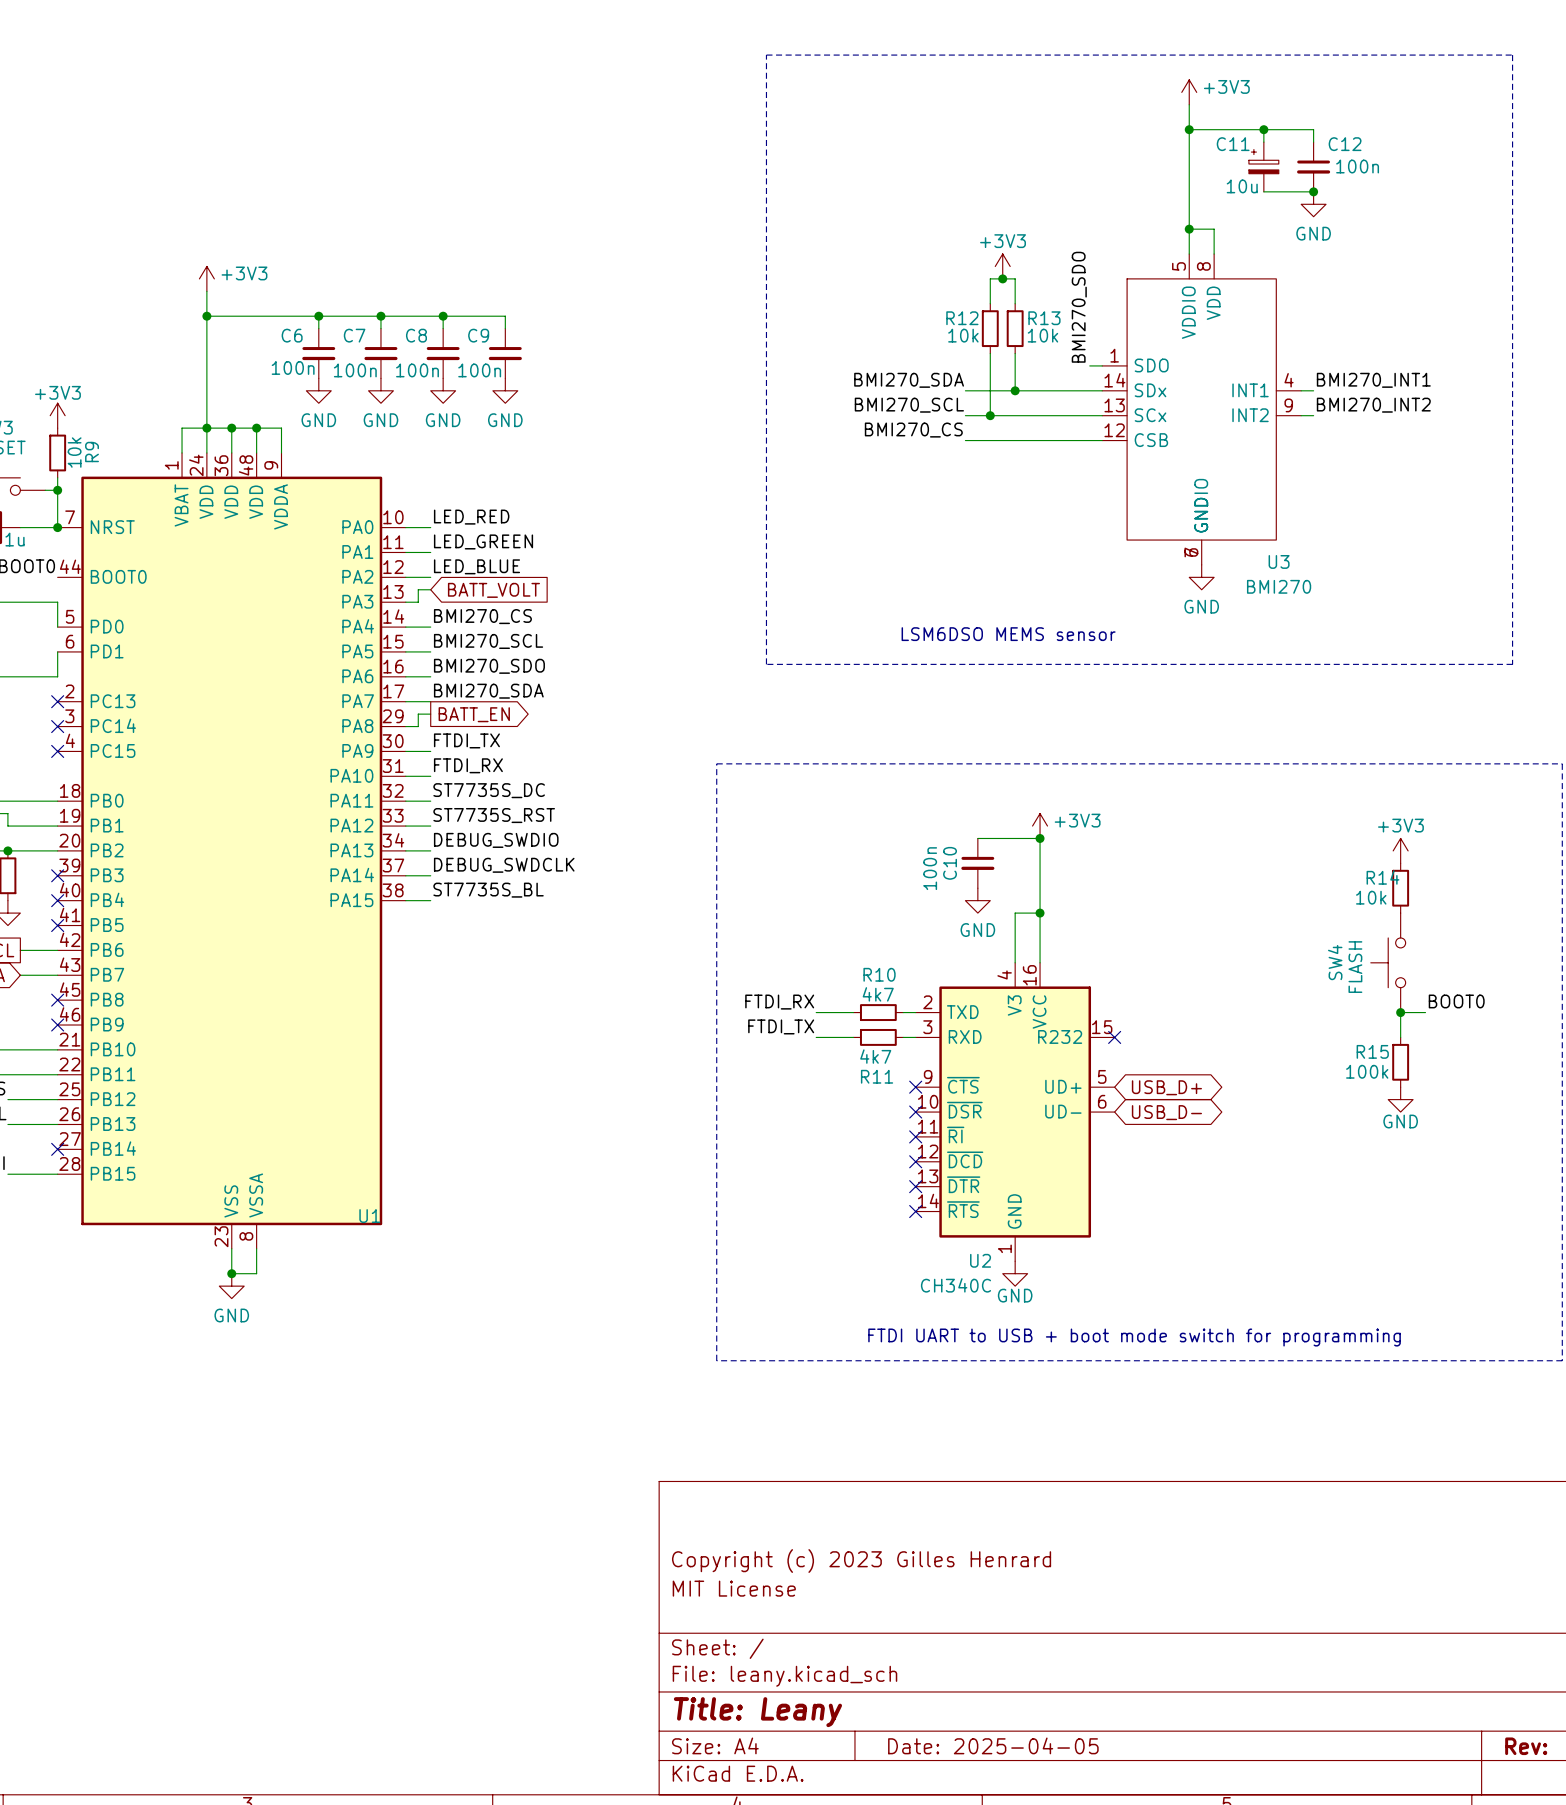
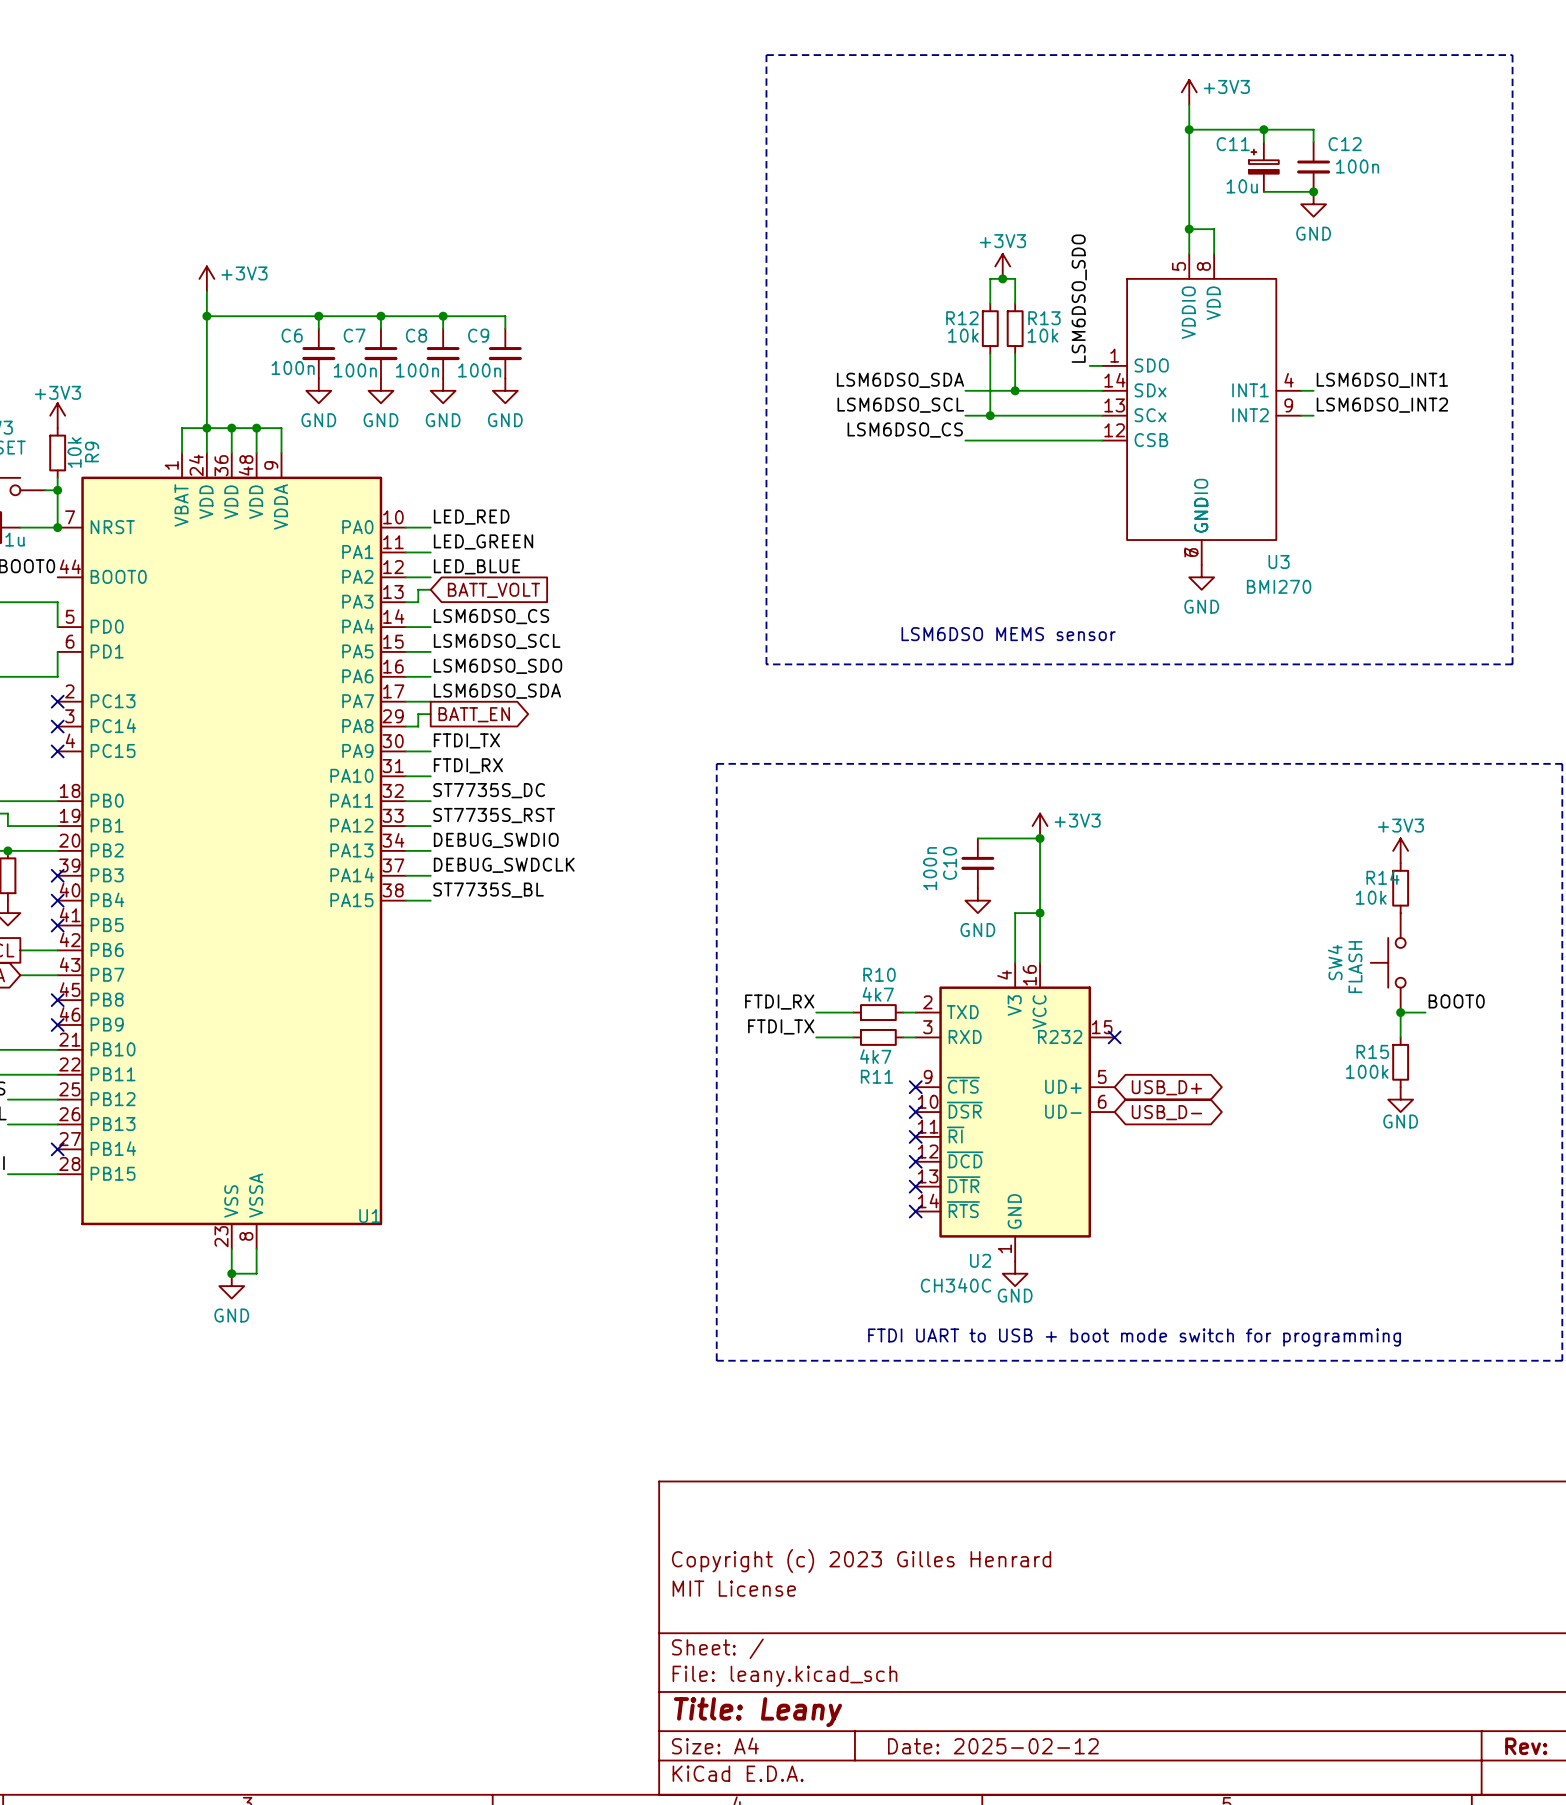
label: BMI270_SDO (1079, 307) -> LSM6DSO_SDO (1079, 298)
label: BMI270_SDA (909, 380) -> LSM6DSO_SDA (900, 380)
label: BMI270_INT1 (1373, 380) -> LSM6DSO_INT1 (1382, 380)
label: BMI270_SCL (909, 405) -> LSM6DSO_SCL (900, 405)
label: BMI270_INT2 (1373, 405) -> LSM6DSO_INT2 (1382, 405)
label: BMI270_CS (913, 430) -> LSM6DSO_CS (905, 430)
label: BMI270_CS (482, 616) -> LSM6DSO_CS (491, 616)
label: BMI270_SCL (488, 641) -> LSM6DSO_SCL (497, 641)
label: BMI270_SDO (489, 666) -> LSM6DSO_SDO (498, 666)
label: BMI270_SDA (488, 691) -> LSM6DSO_SDA (497, 691)
title block: Date: 2025-04-05 (993, 1745) -> Date: 2025-02-12 (993, 1746)

